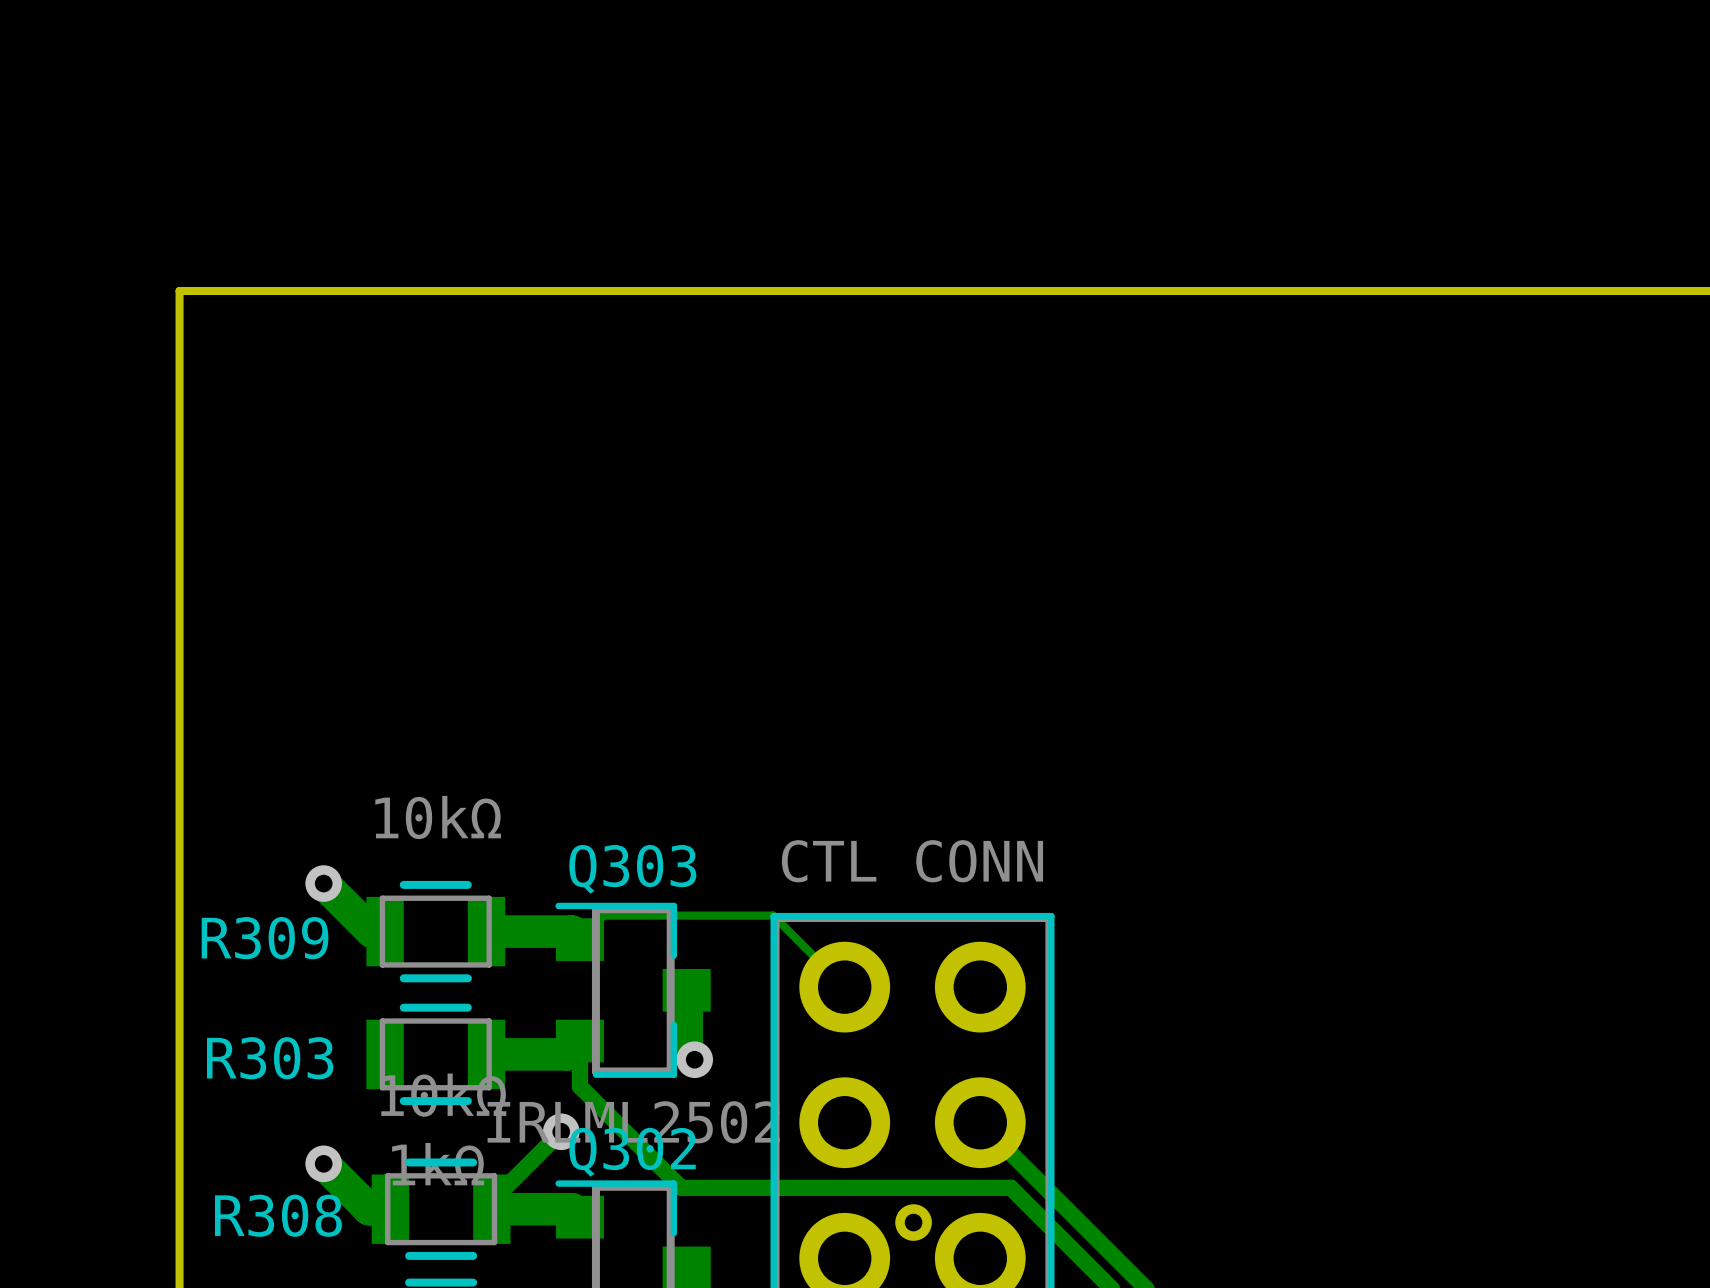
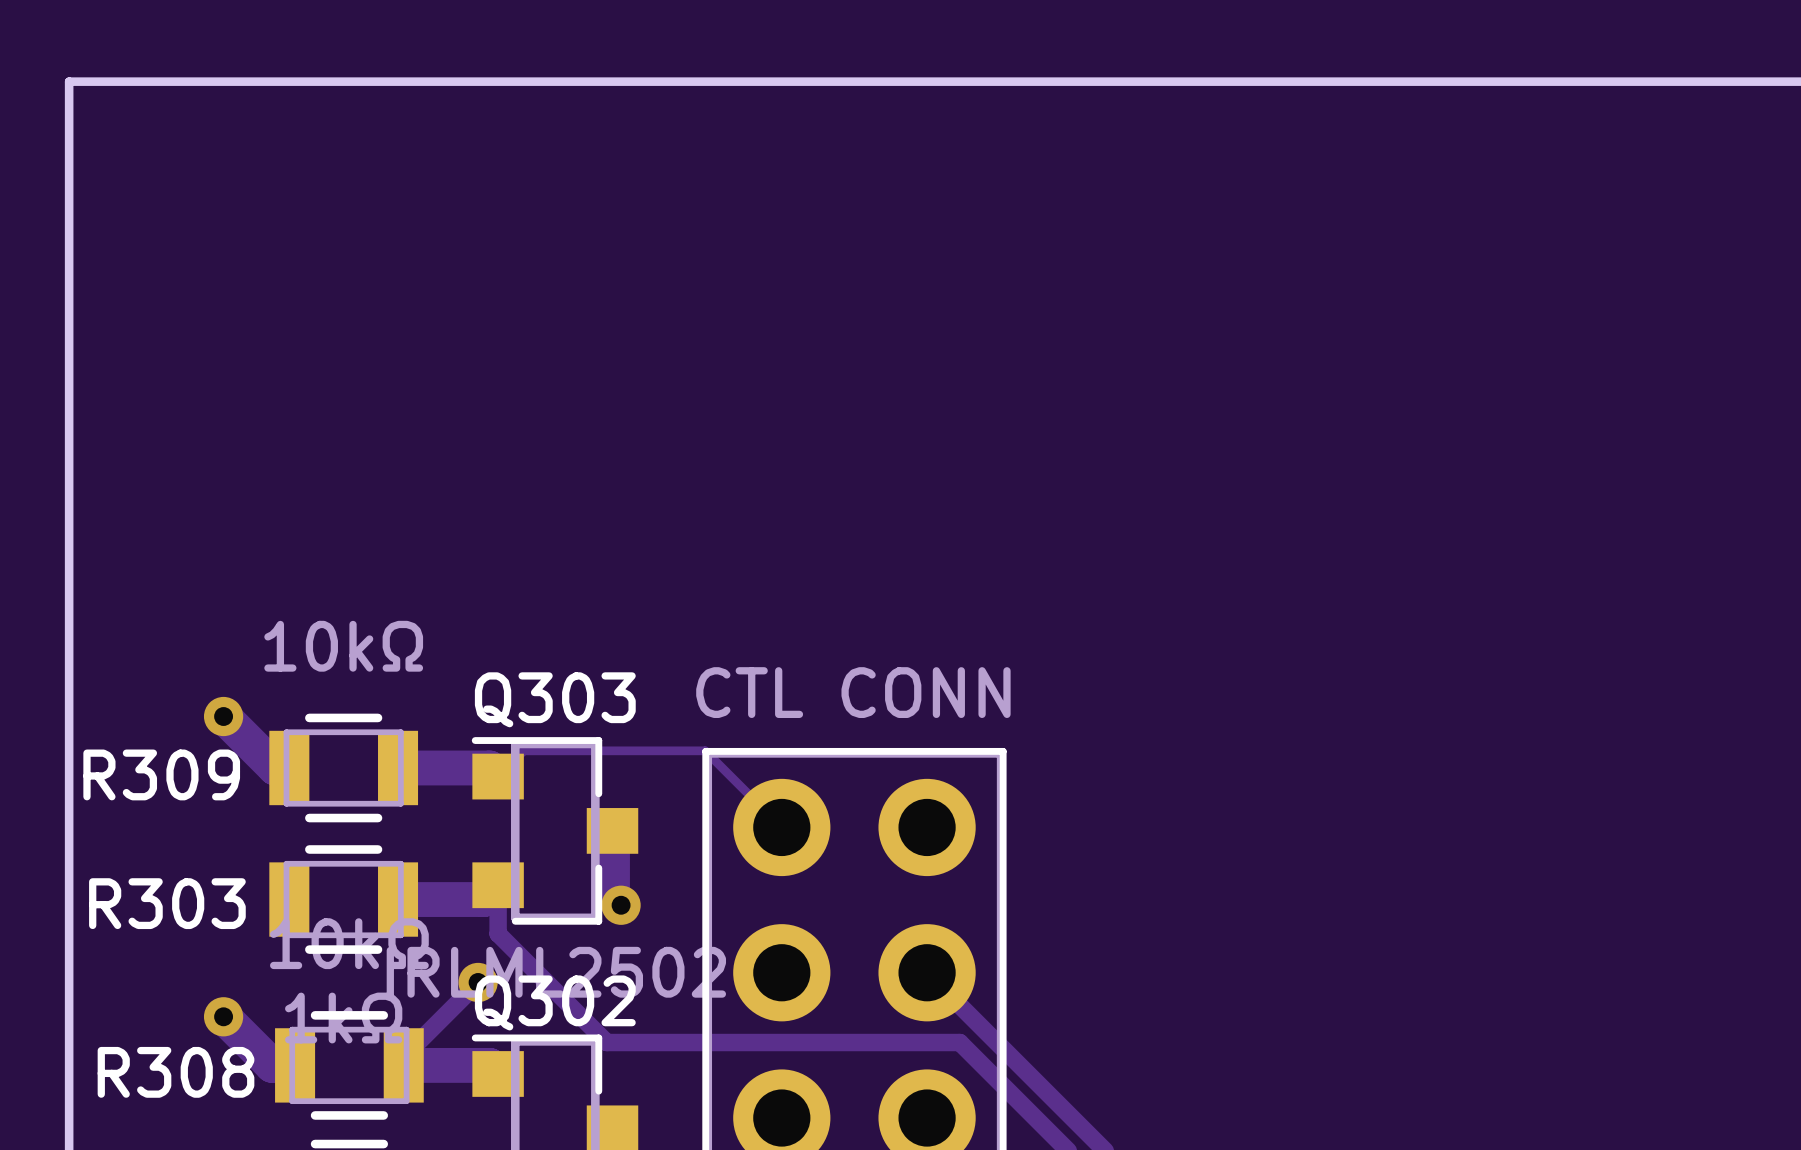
part: (913, 1222) -> none

